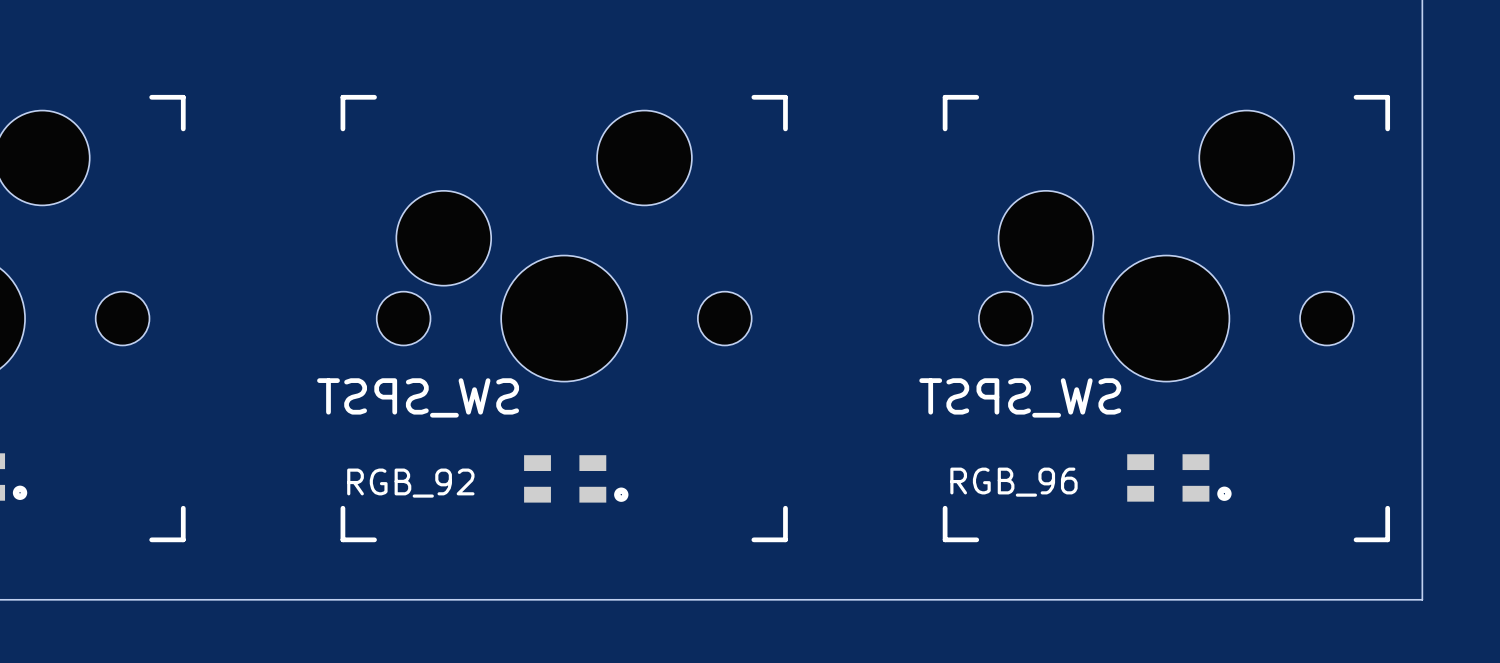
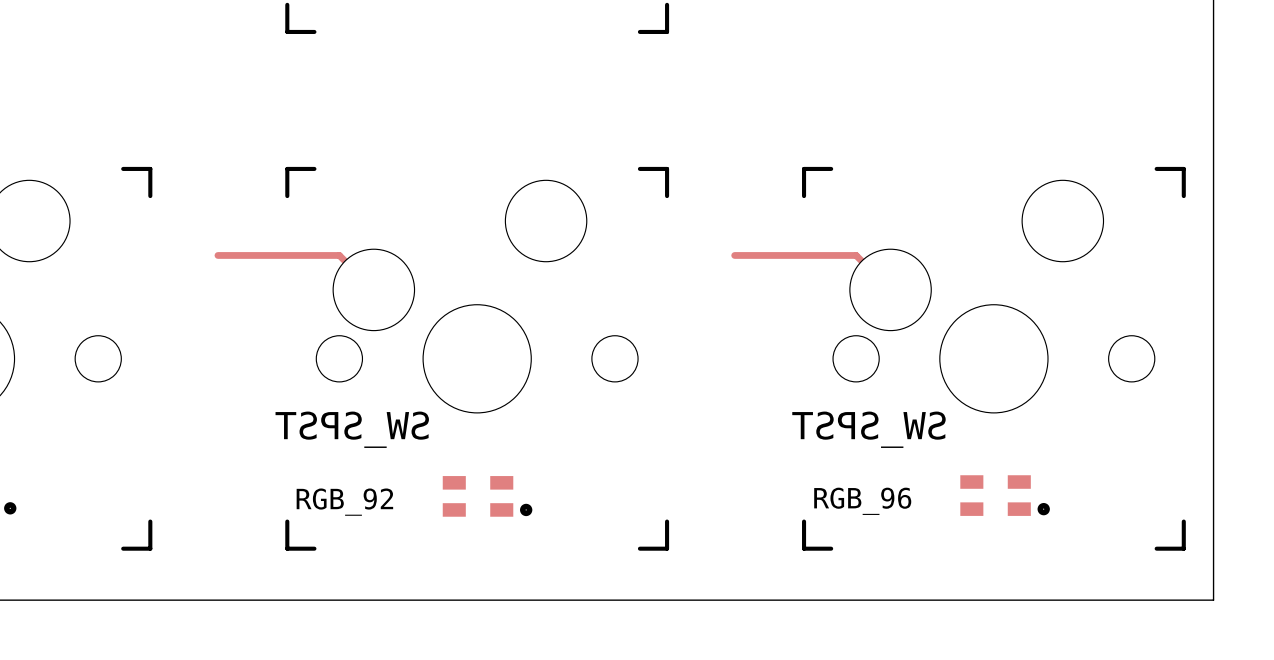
track: none -> (217, 255) (339, 255) (373, 289)
track: none -> (734, 255) (856, 255) (890, 289)

